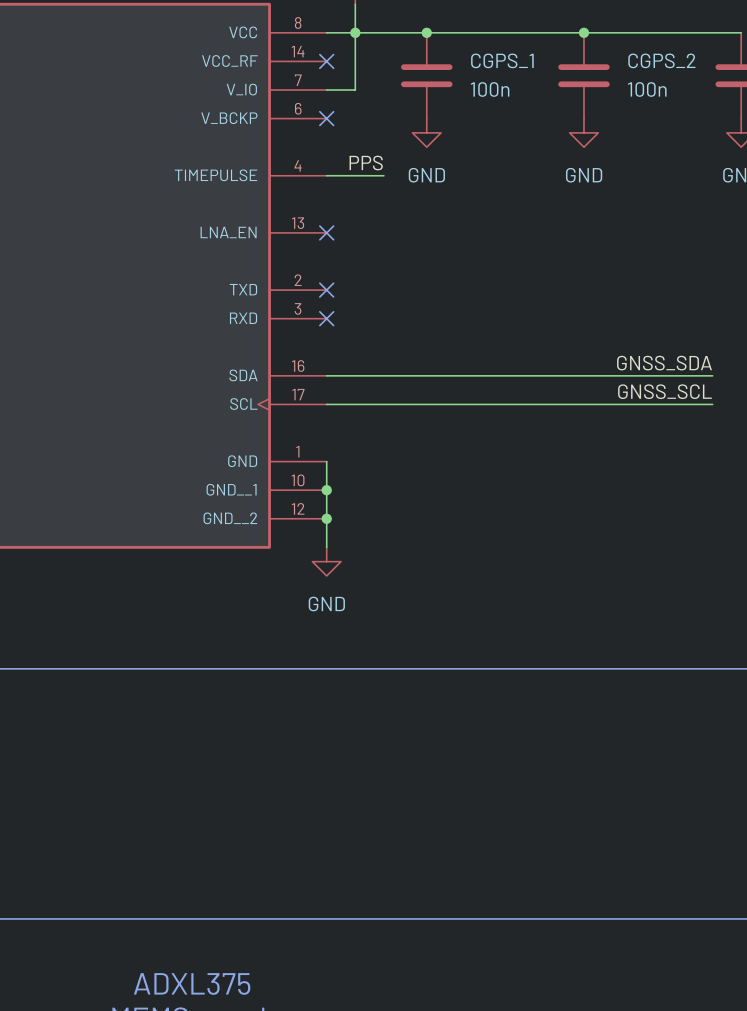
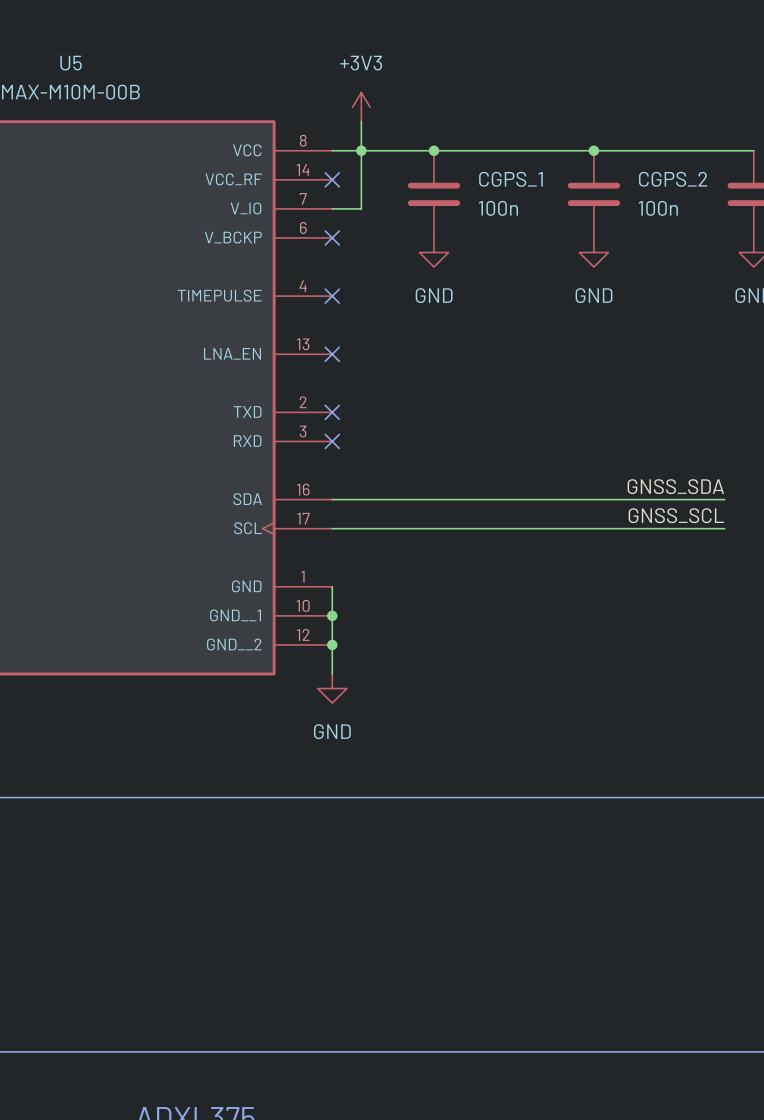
label: PPS (366, 163) -> none
wire: (326, 175) (383, 175) -> none
no-connect mark: none -> (332, 296)

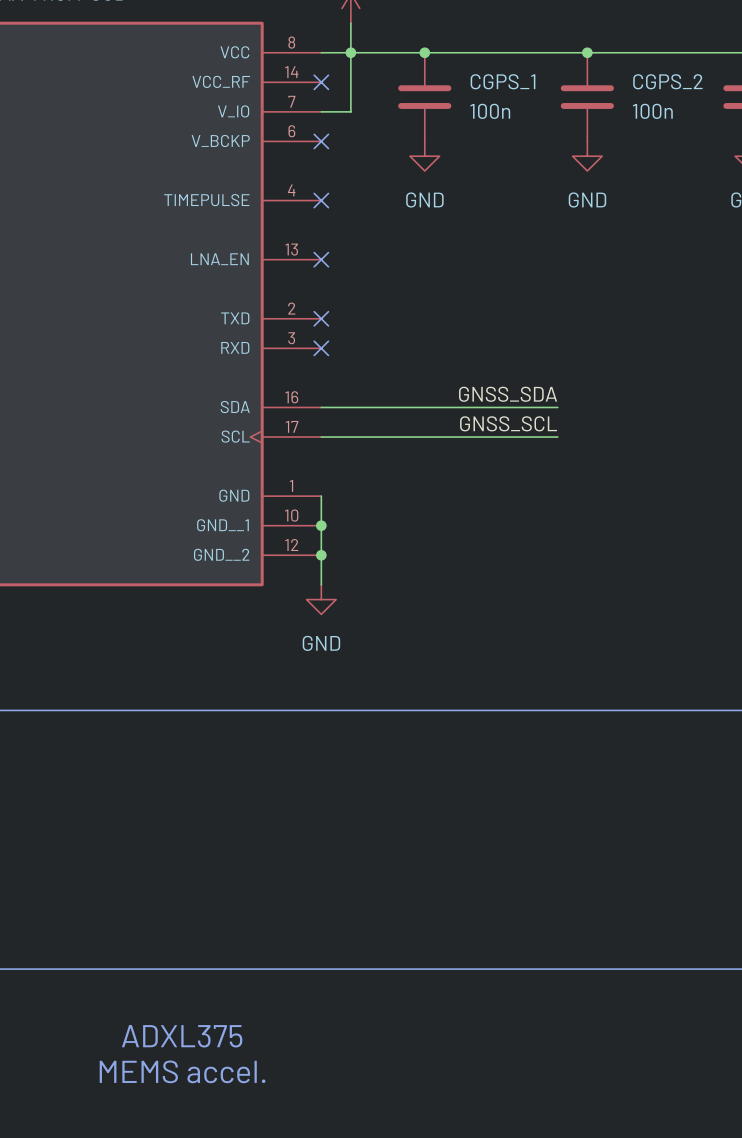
label position: GNSS_SDA (675, 486) -> GNSS_SDA (508, 394)
wire: (564, 499) (724, 499) -> none
label position: GNSS_SCL (676, 515) -> GNSS_SCL (508, 423)
wire: (564, 528) (724, 528) -> none

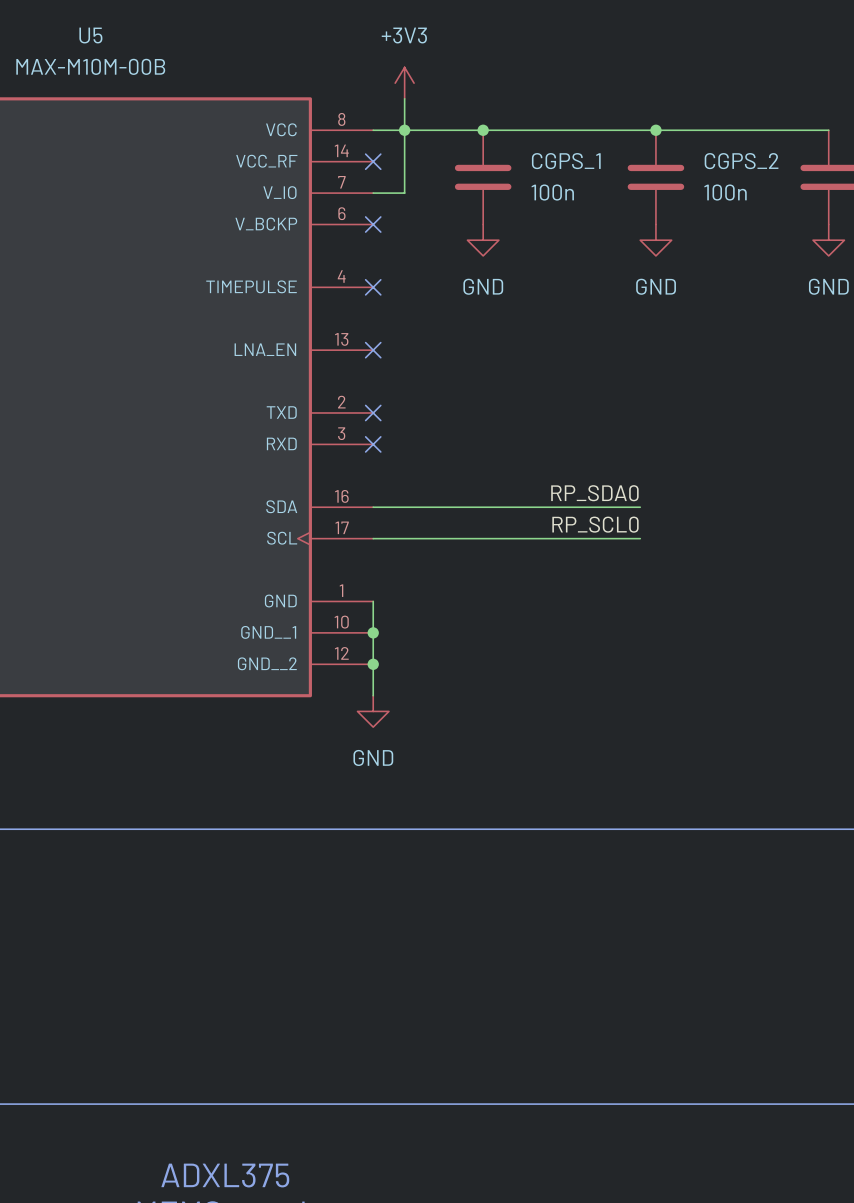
label: GNSS_SDA (508, 394) -> none
label: none -> RP_SDA0 (594, 493)
wire: none -> (624, 507) (640, 507)
label: GNSS_SCL (508, 423) -> none
label: none -> RP_SCL0 (595, 524)
wire: none -> (624, 538) (640, 538)

